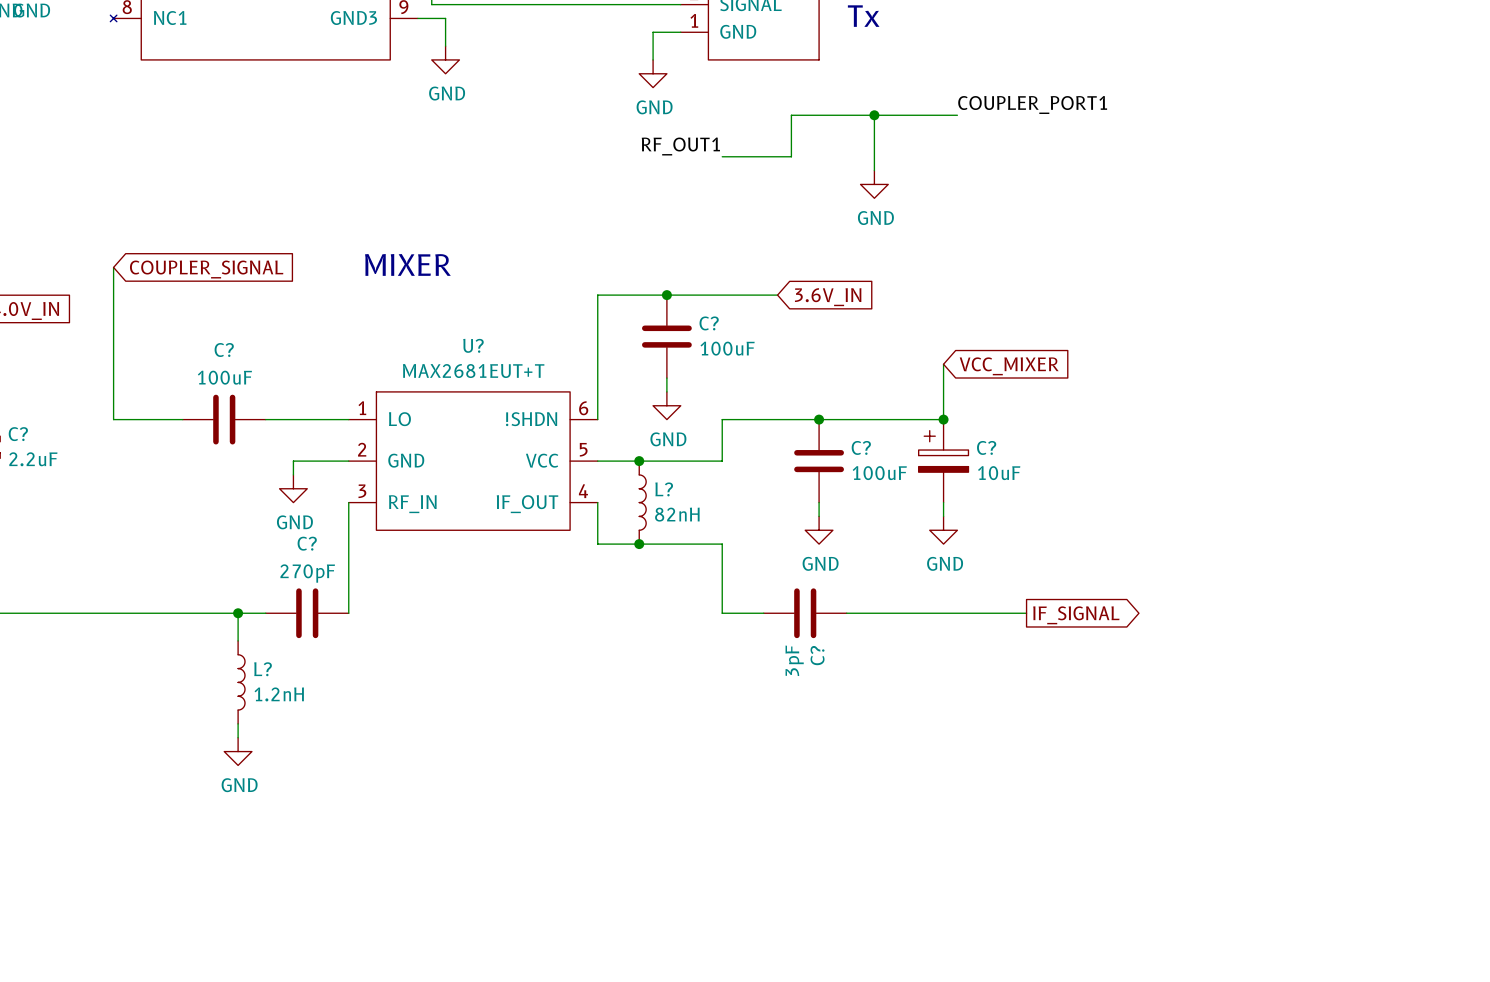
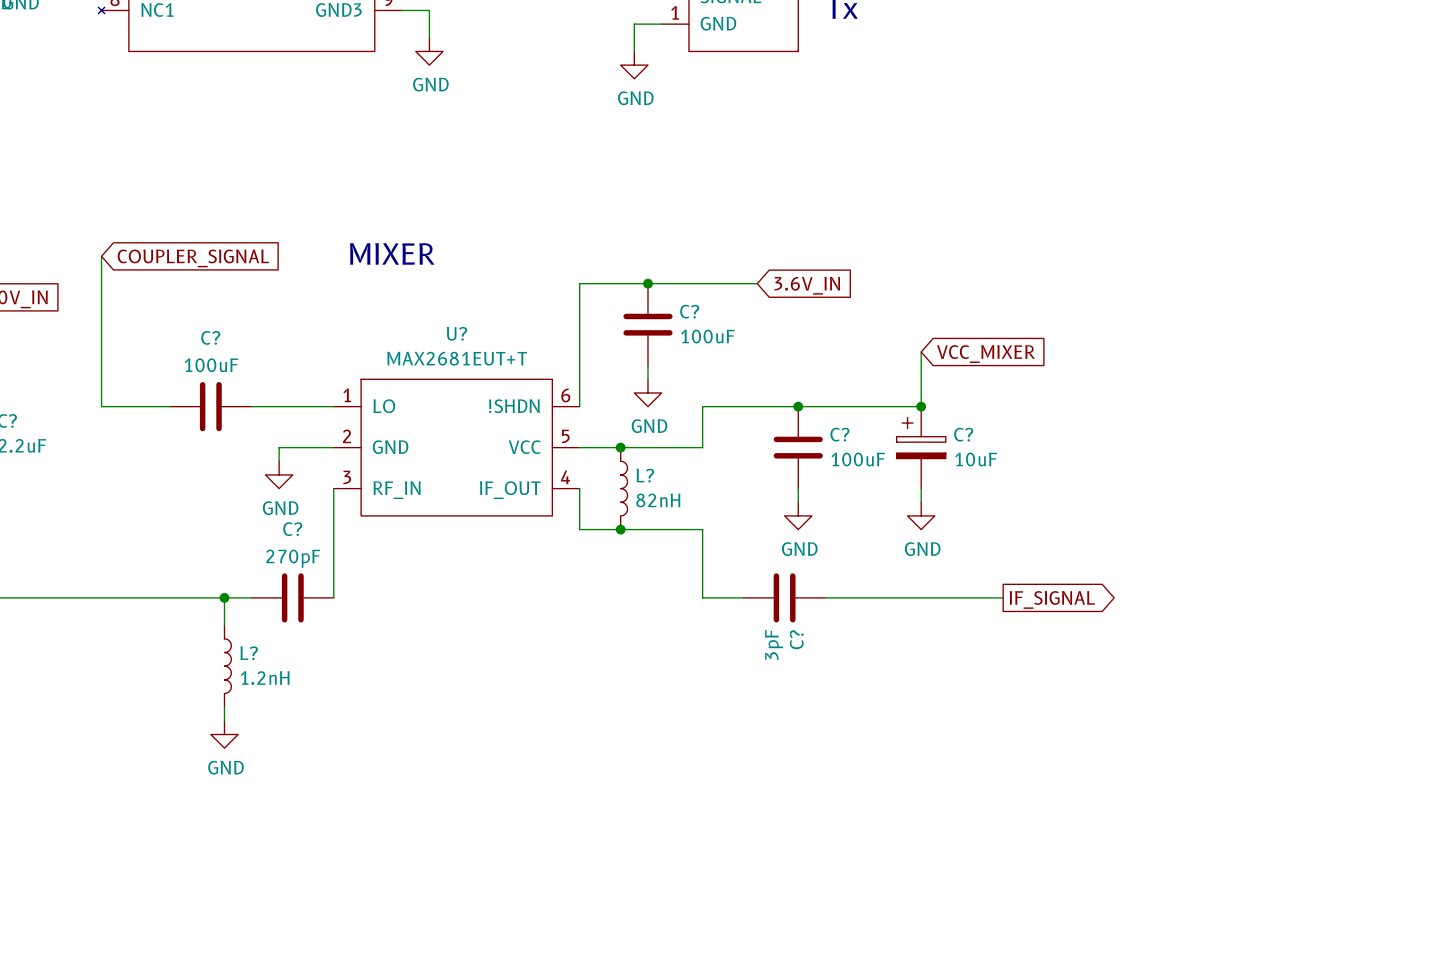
label: COUPLER_PORT1 (1032, 105) -> none
wire: (874, 115) (874, 170) -> none
junction: (874, 115) -> none
wire: (957, 115) (791, 115) (791, 156) (722, 156) -> none
label: RF_OUT1 (680, 146) -> none
power symbol: GND (874, 184) -> none

